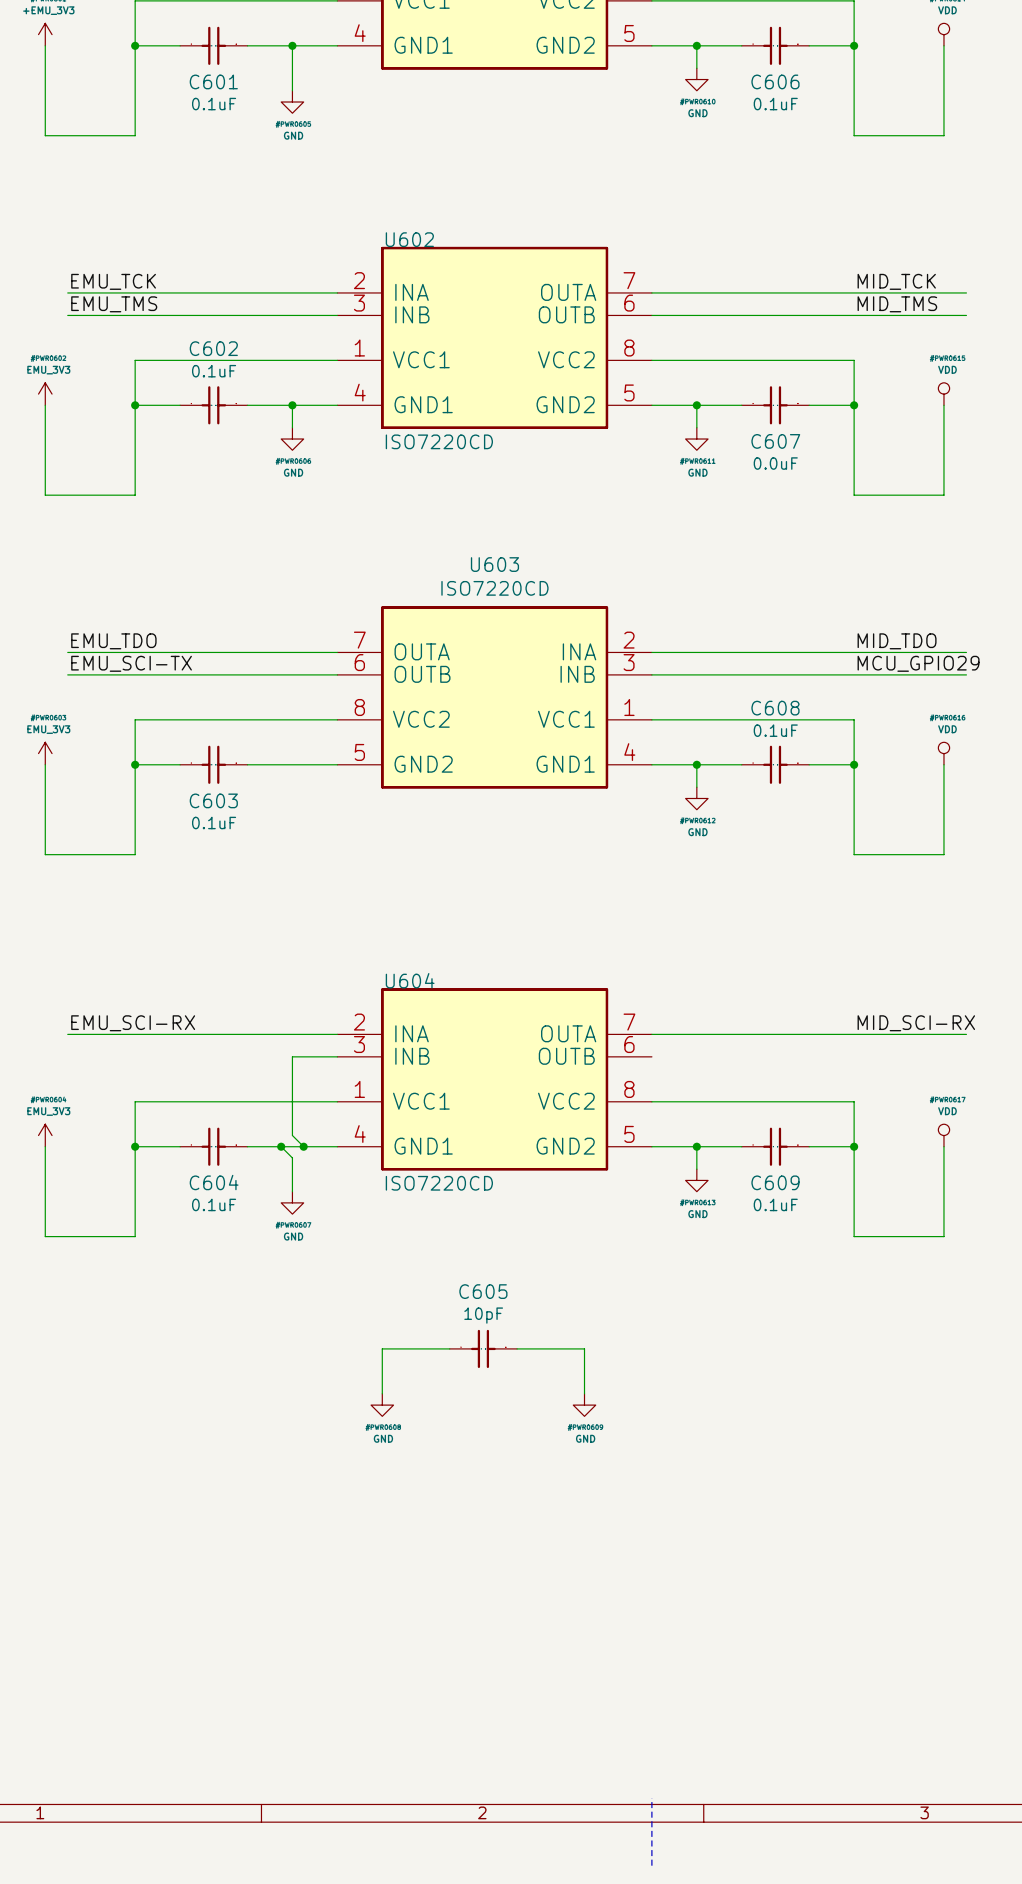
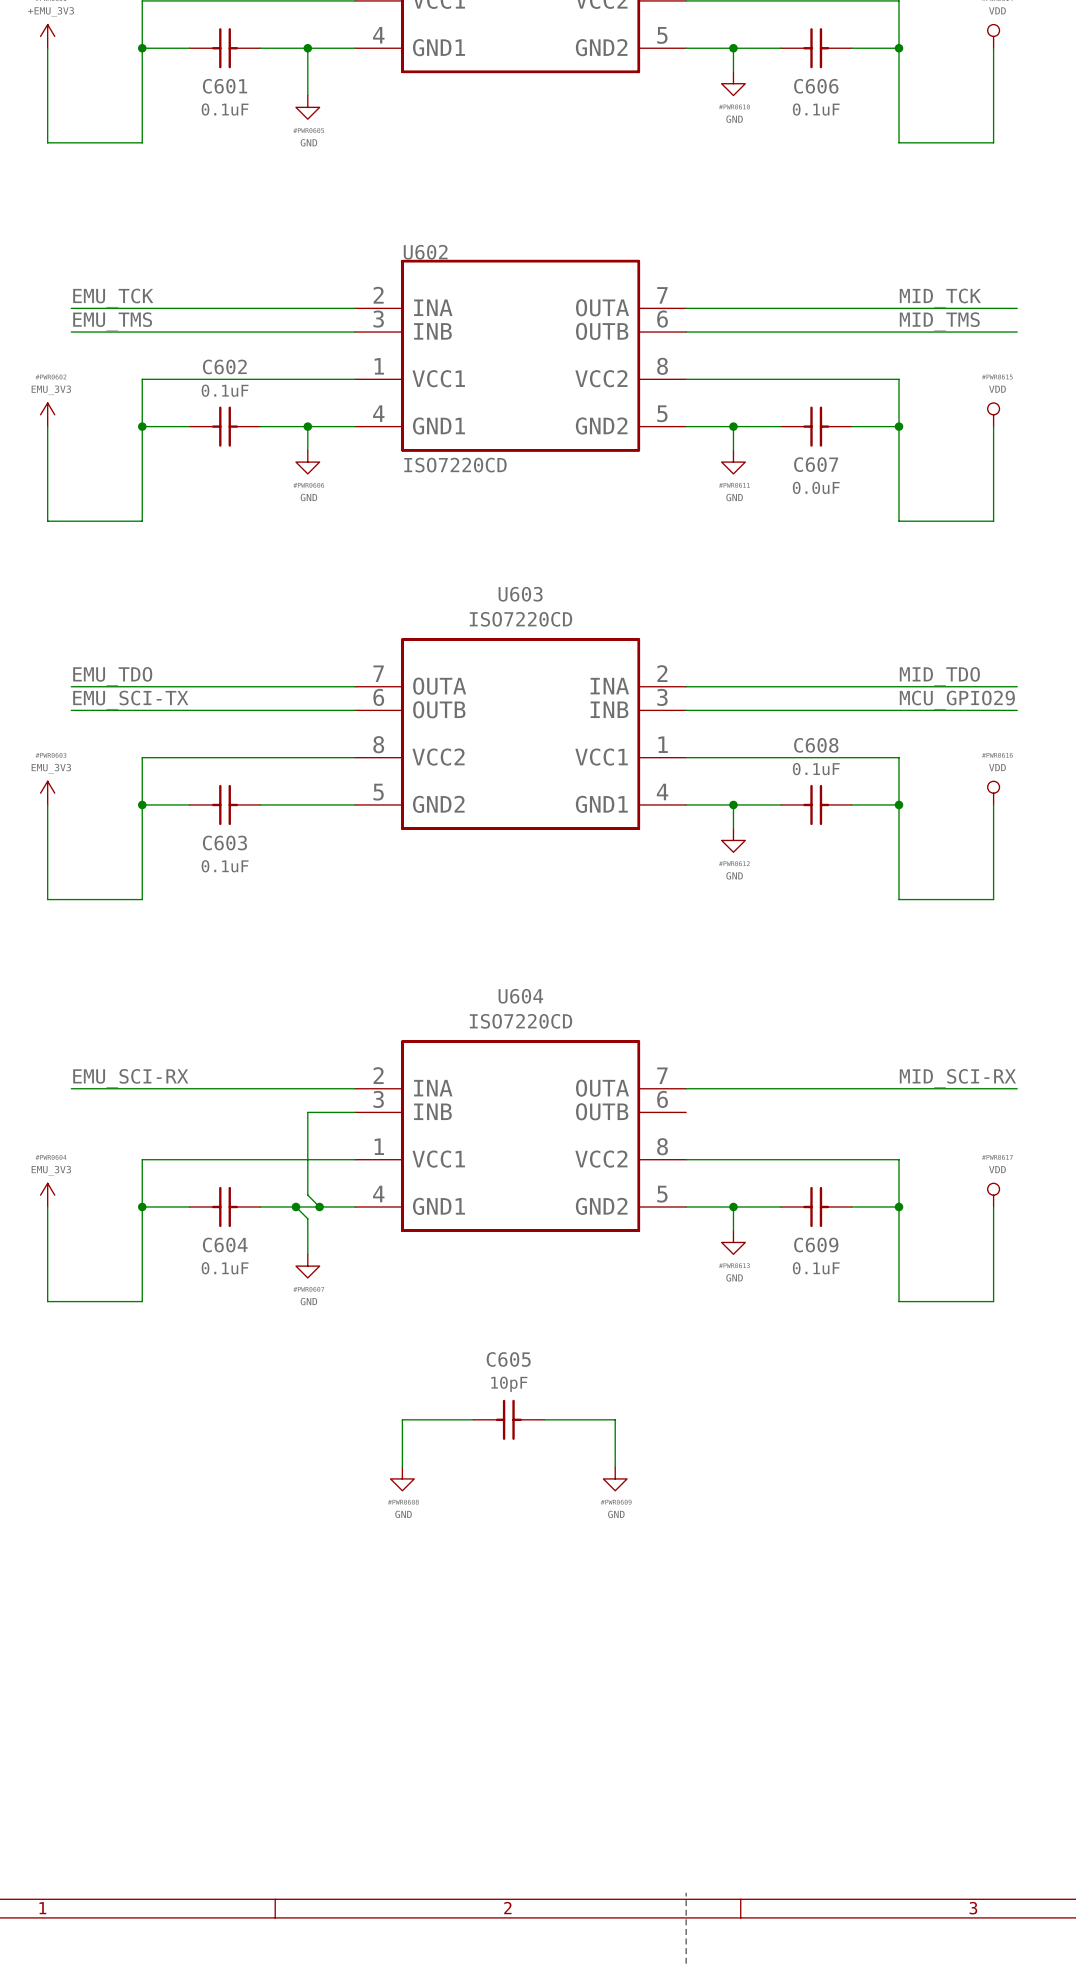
U604 name position: U604 (410, 980) -> U604 (520, 996)
U604 value position: ISO7220CD (439, 1183) -> ISO7220CD (520, 1021)

